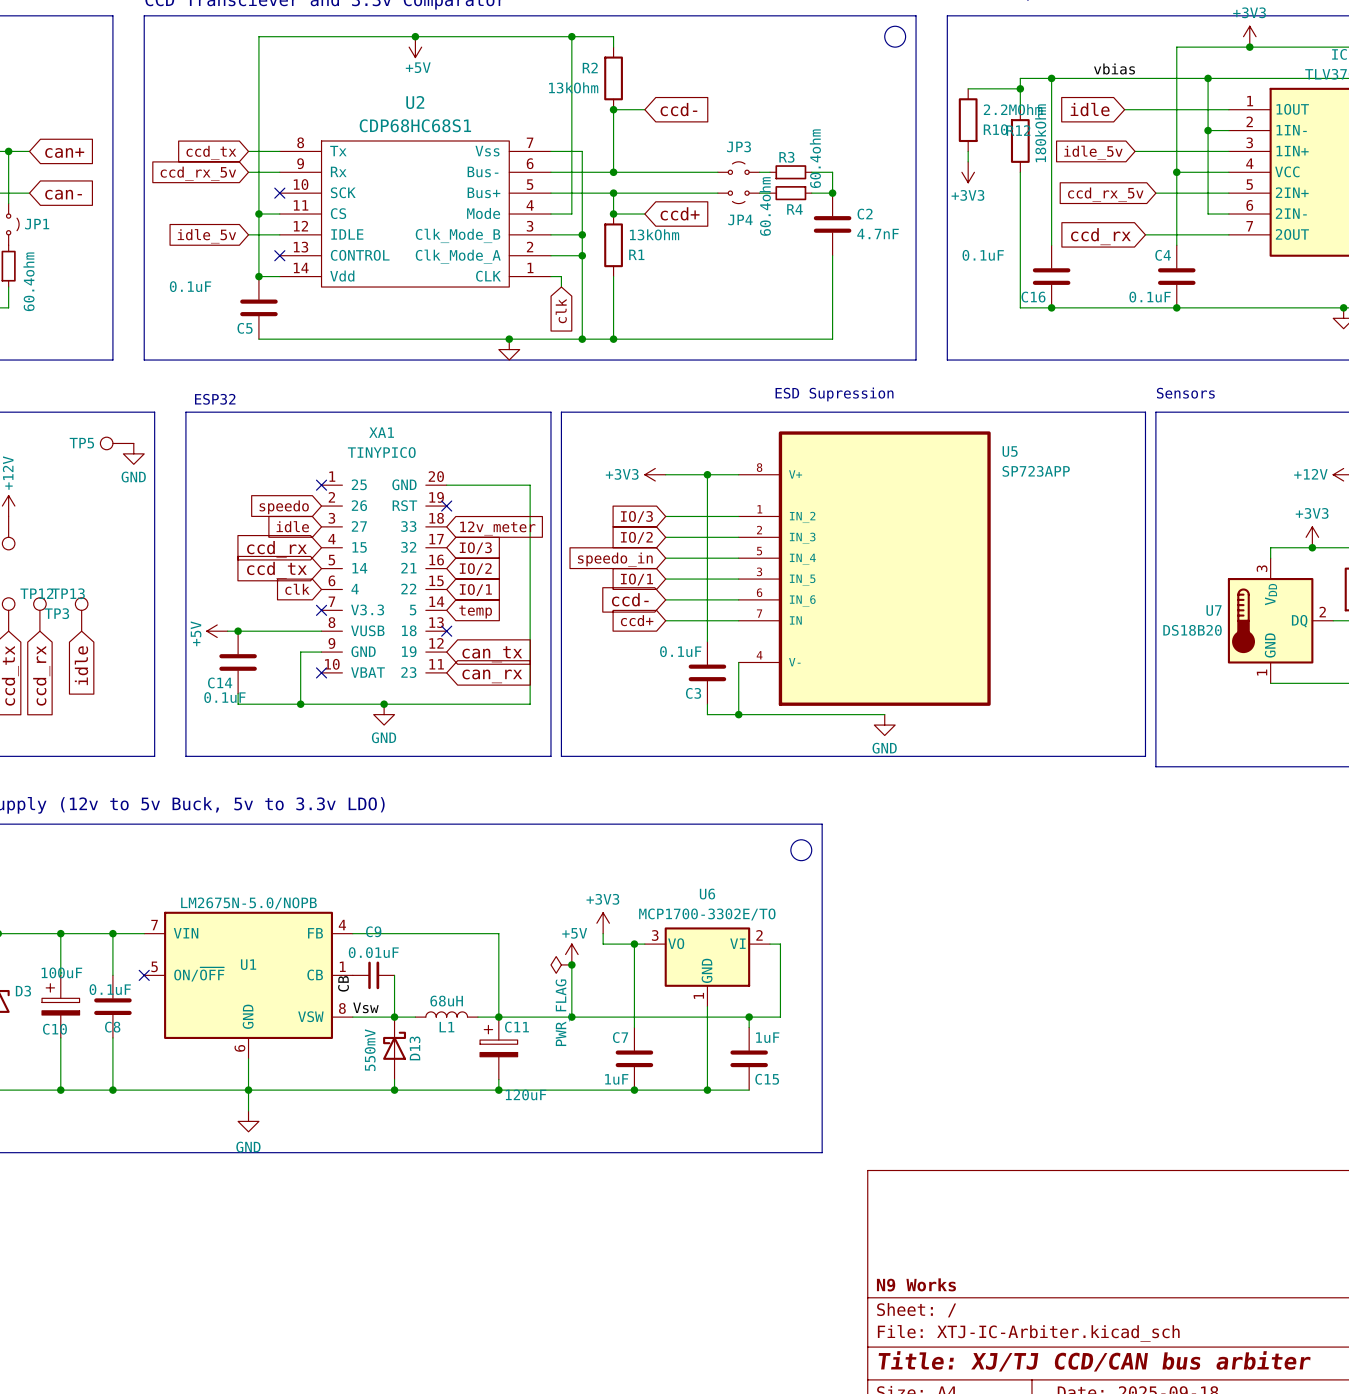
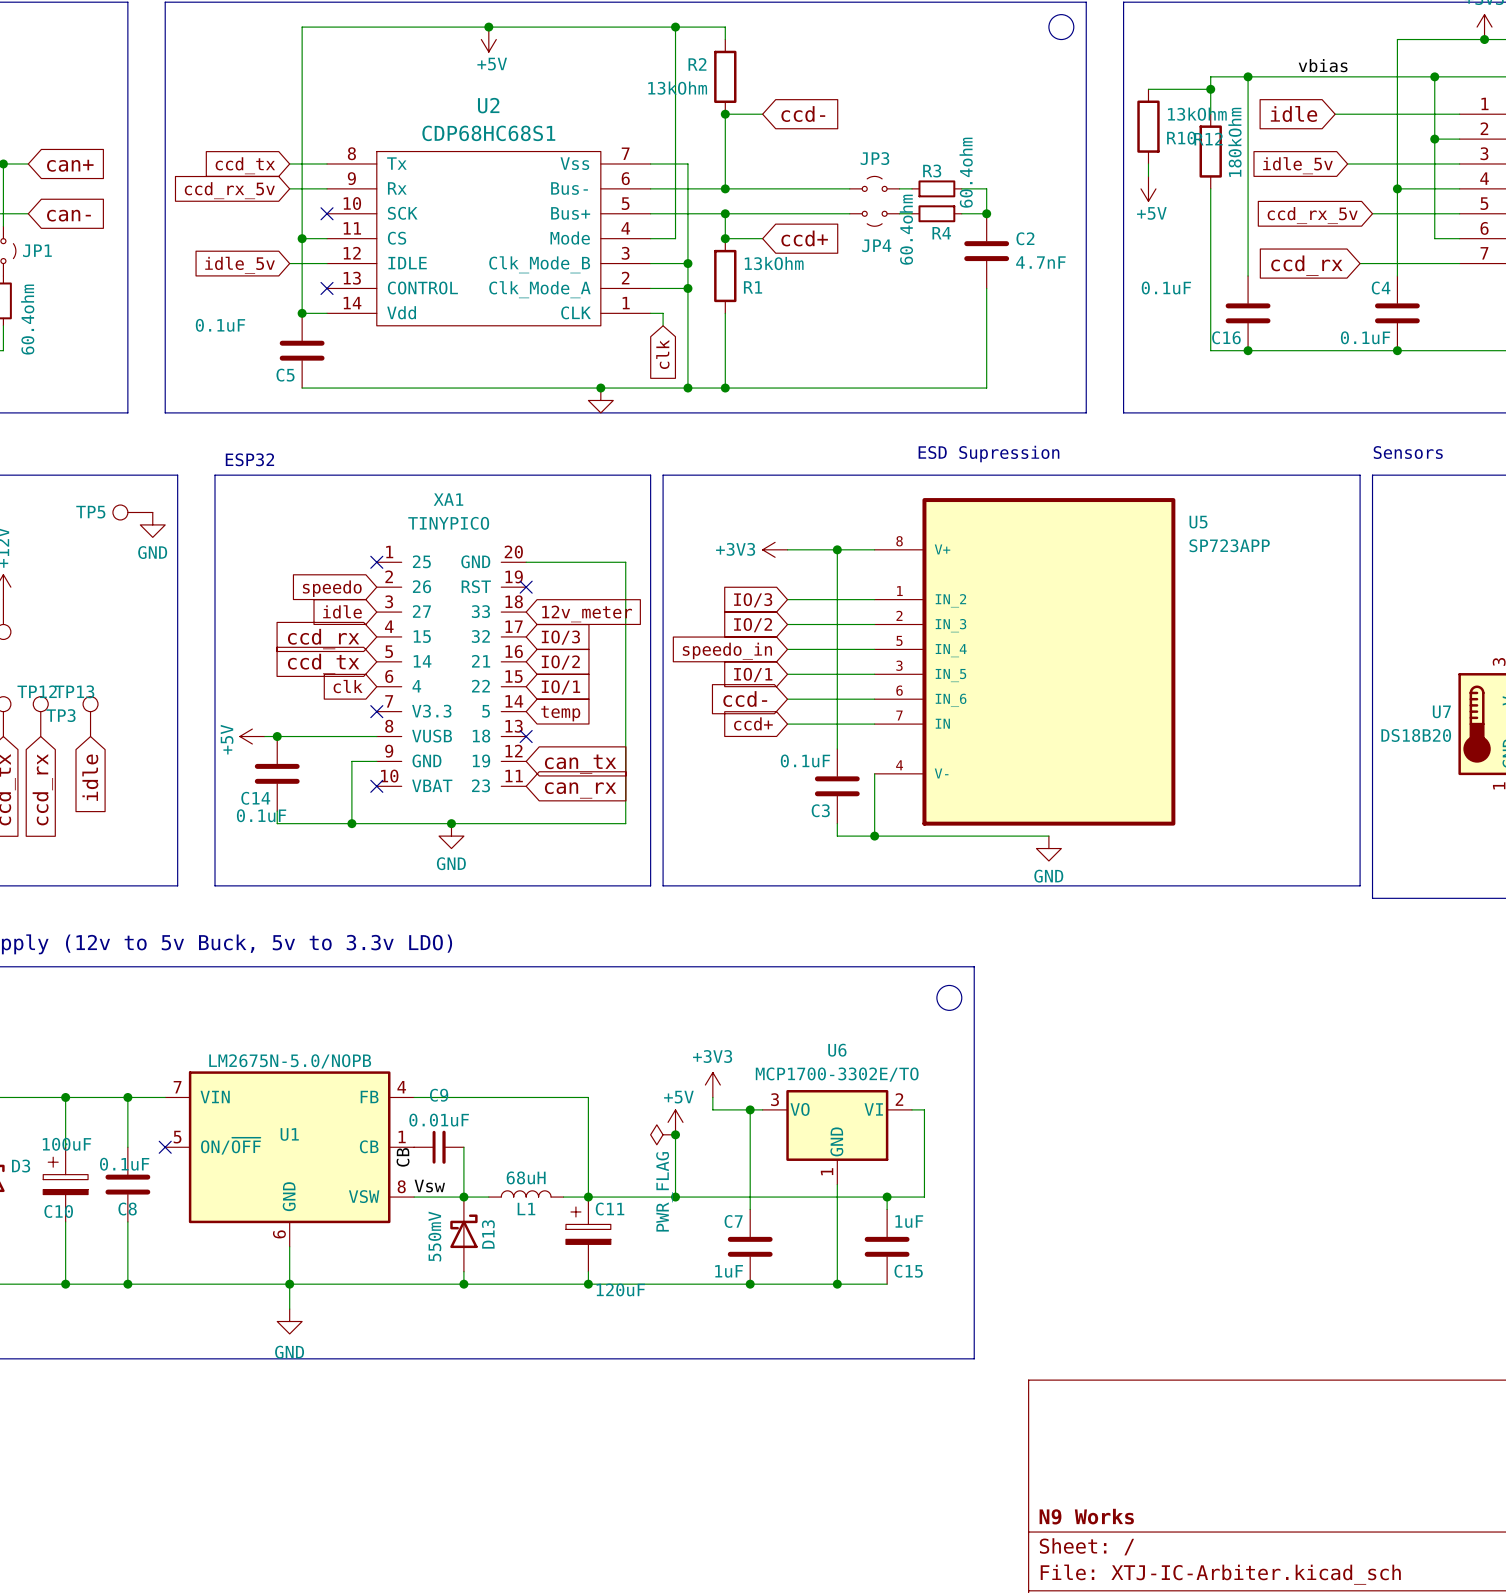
R10 value: 2.2MOhm (1013, 109) -> 13kOhm (1197, 114)
power symbol: +3V3 (968, 172) -> +5V (1148, 188)

